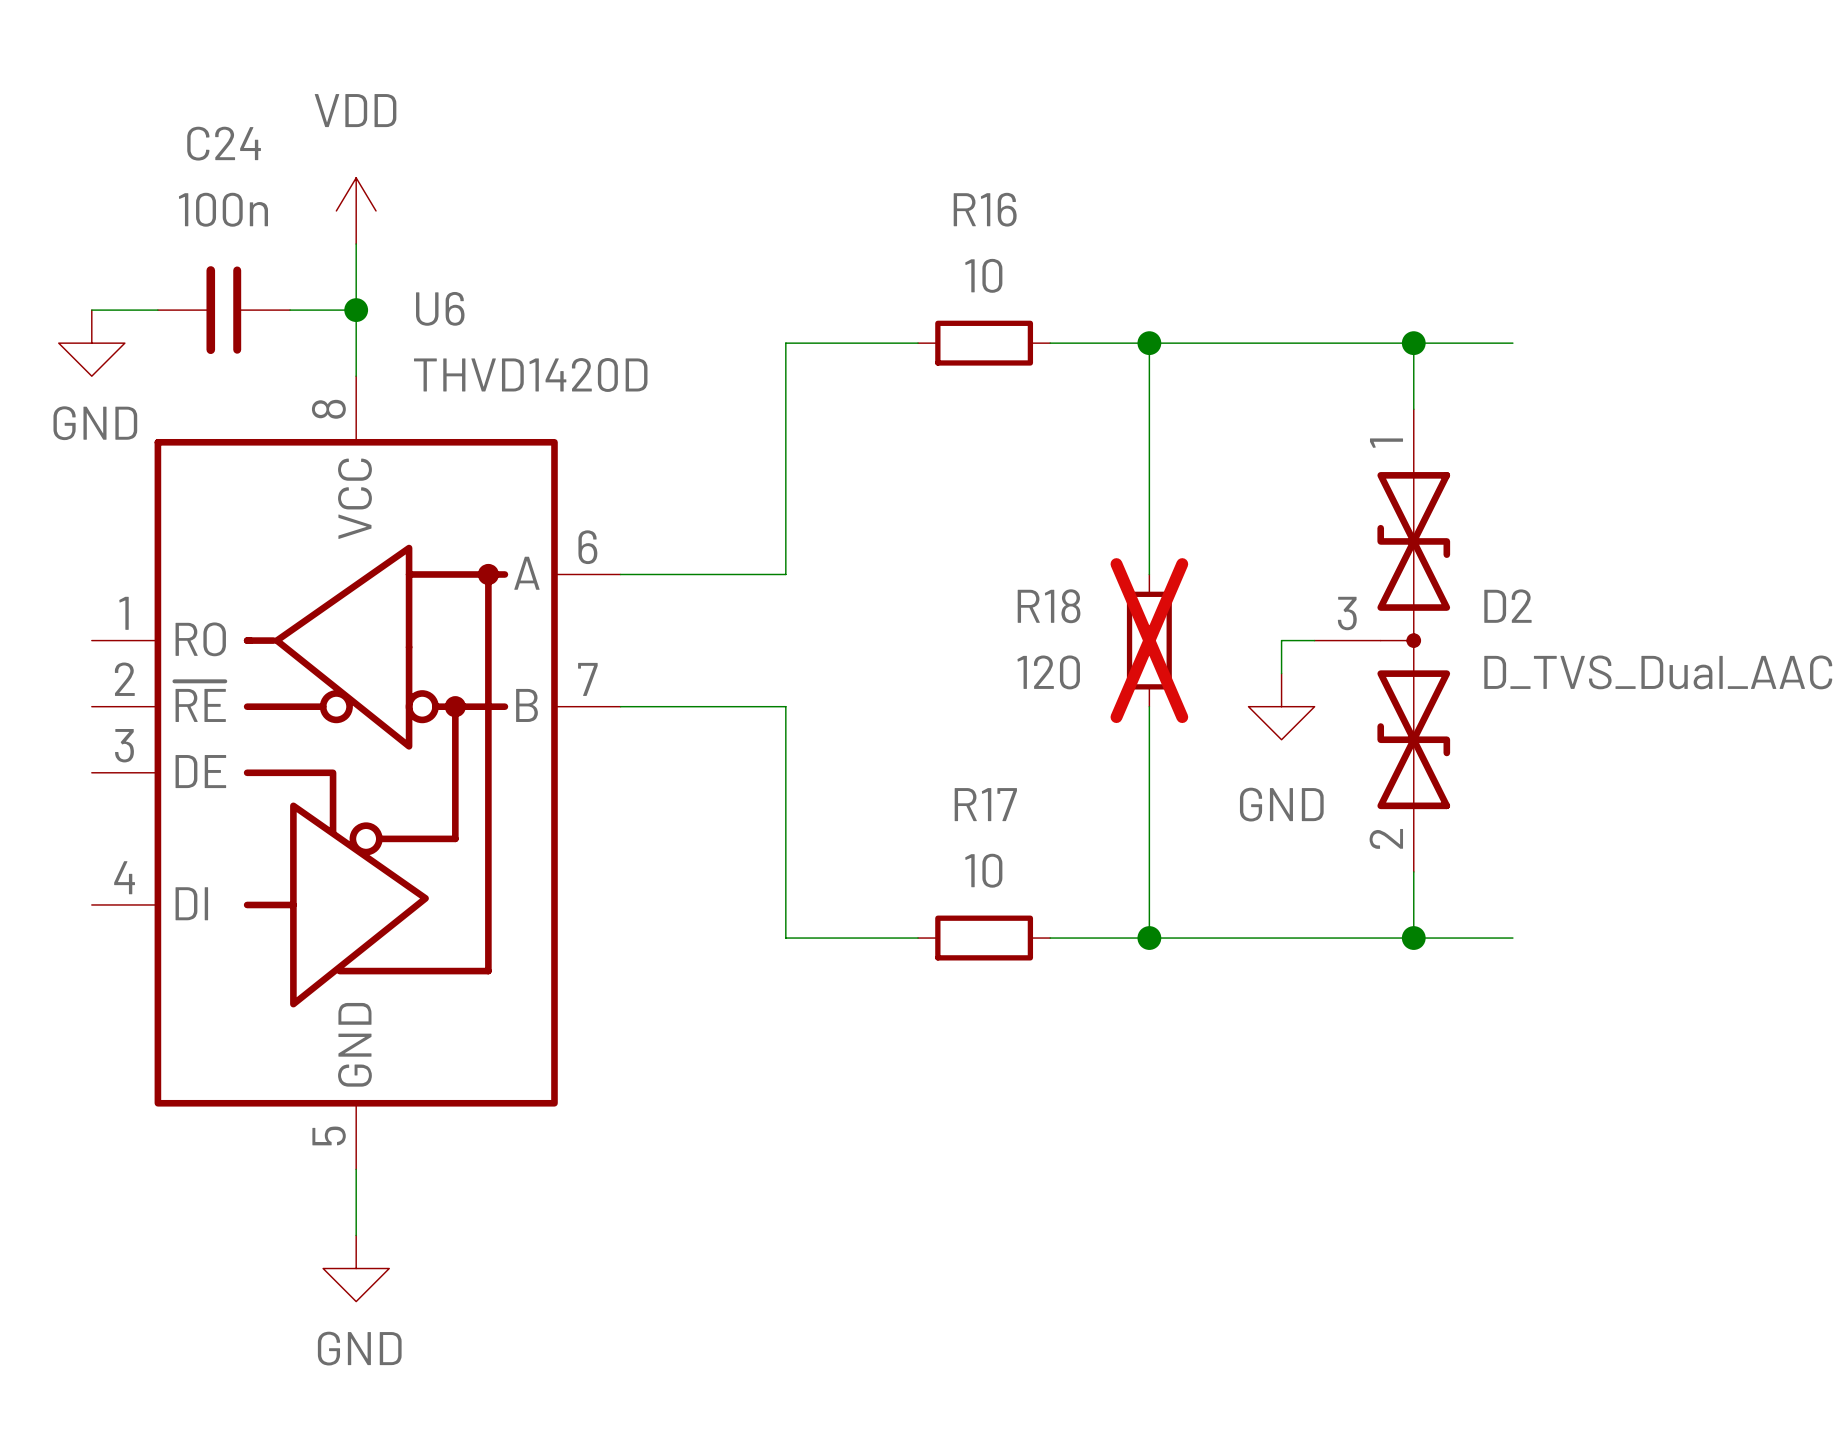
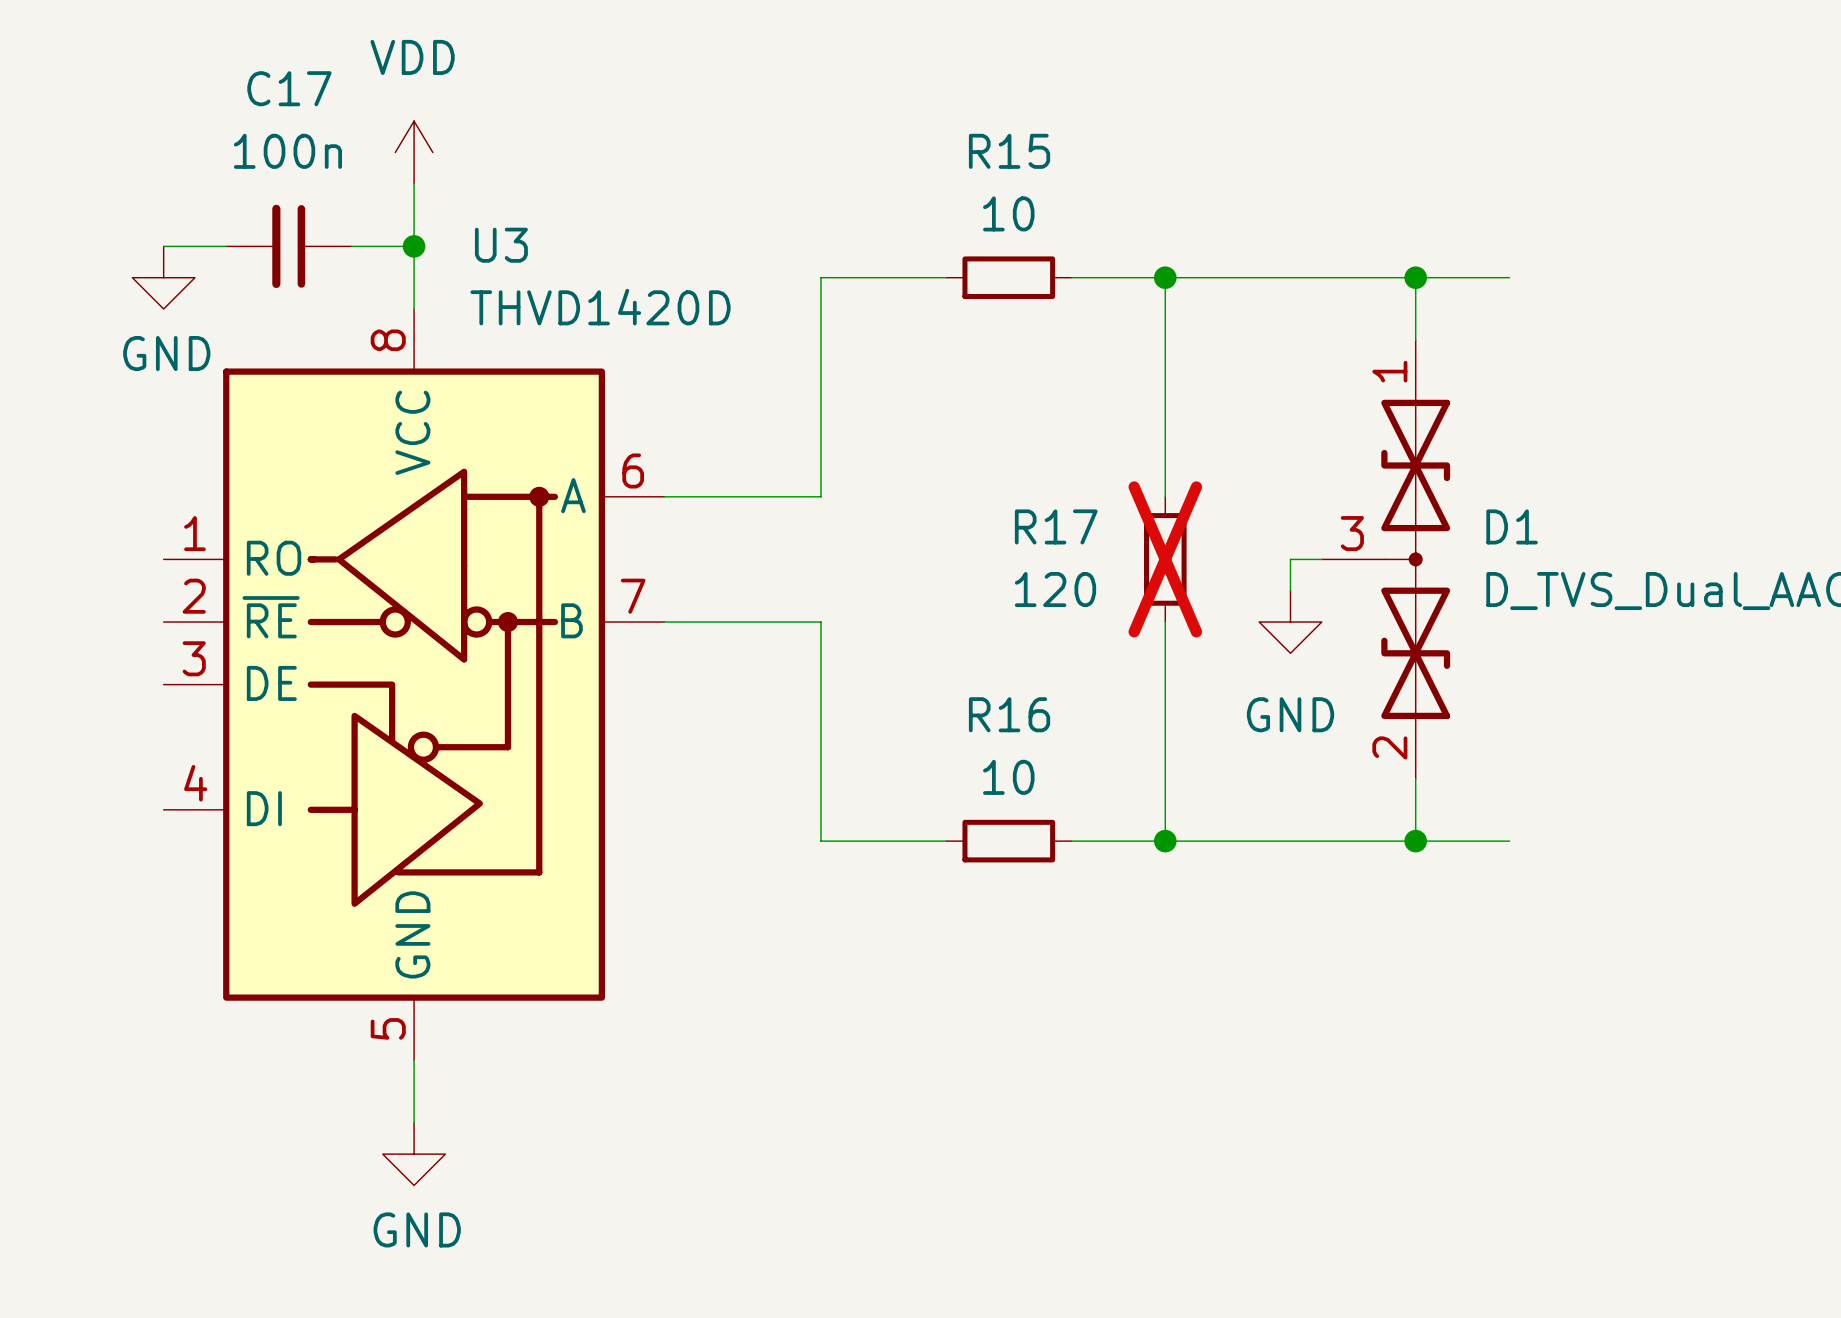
C24 name: C24 (224, 143) -> C17 (289, 88)
R16 name: R16 (985, 209) -> R15 (1009, 151)
U6 name: U6 (440, 308) -> U3 (501, 245)
R18 name: R18 (1049, 606) -> R17 (1056, 526)
D2 name: D2 (1507, 606) -> D1 (1512, 526)
R17 name: R17 (985, 804) -> R16 (1009, 714)

